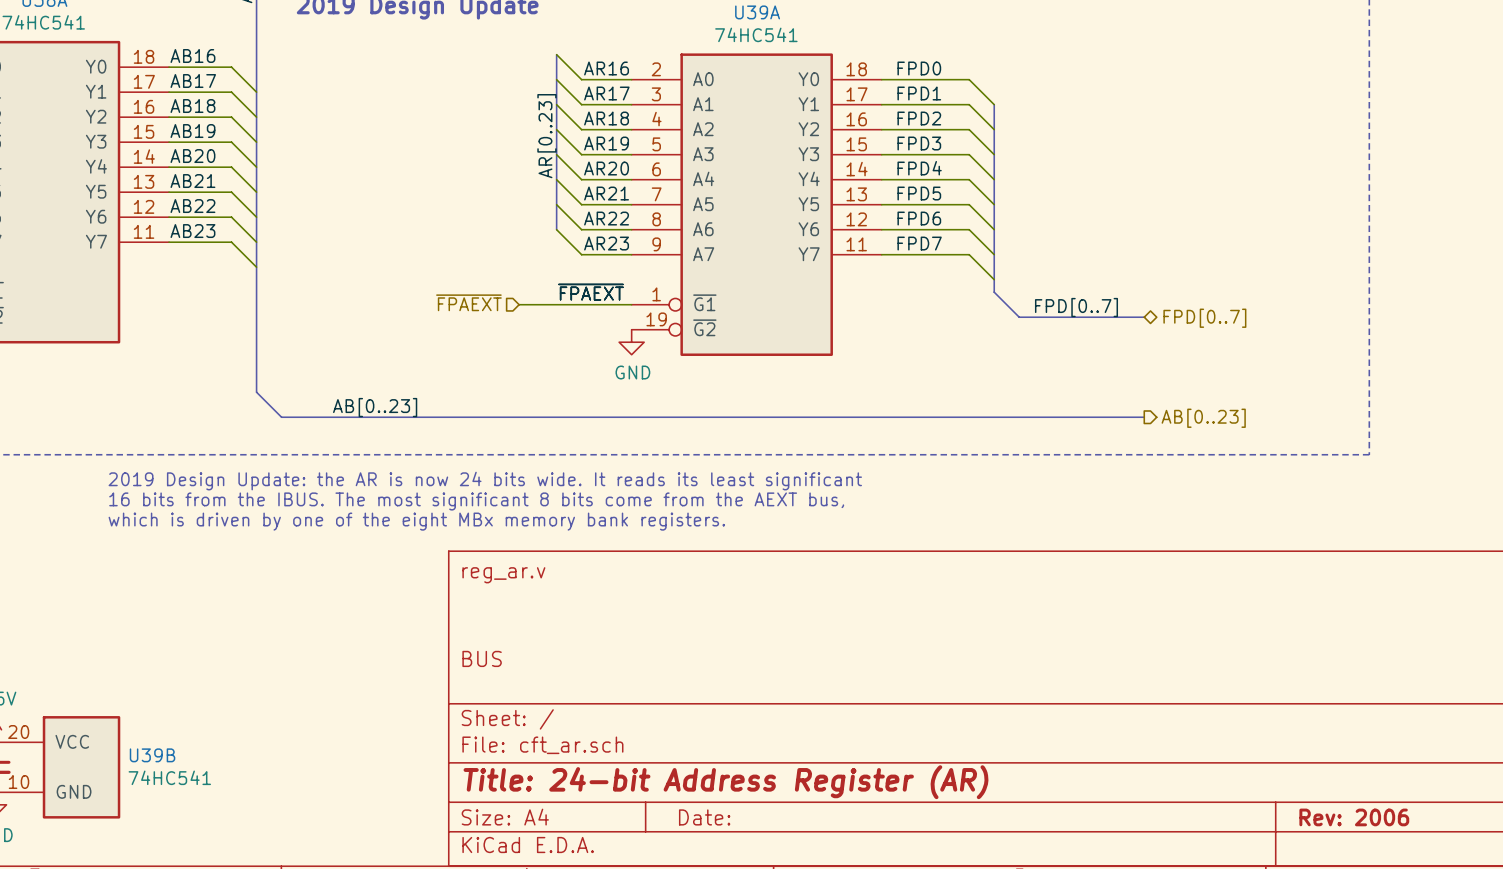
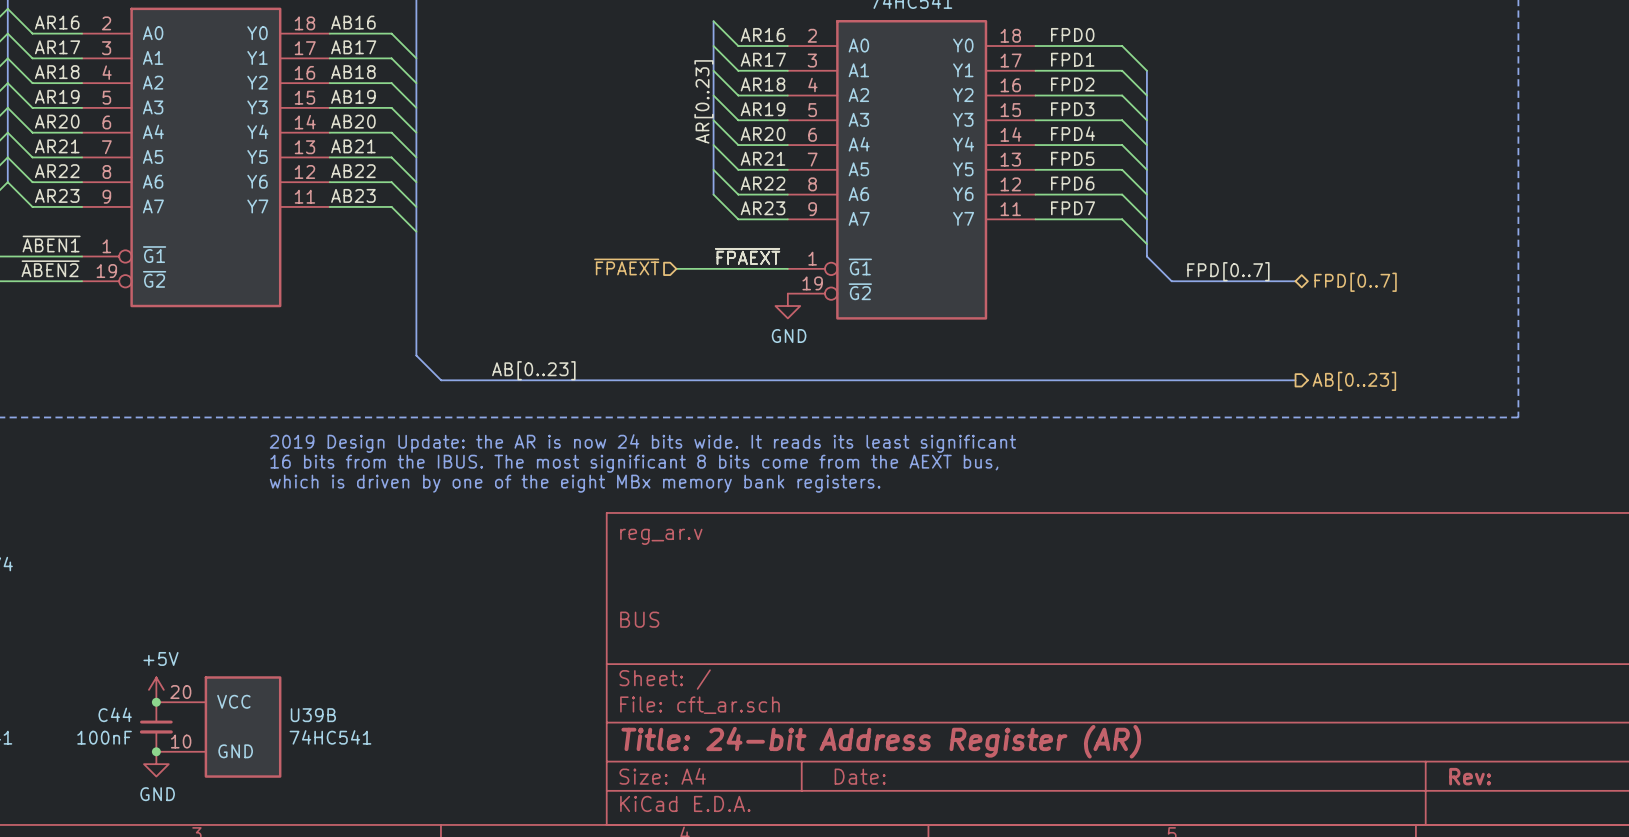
title block: Rev: 2006 (1354, 817) -> Rev: (1470, 776)

